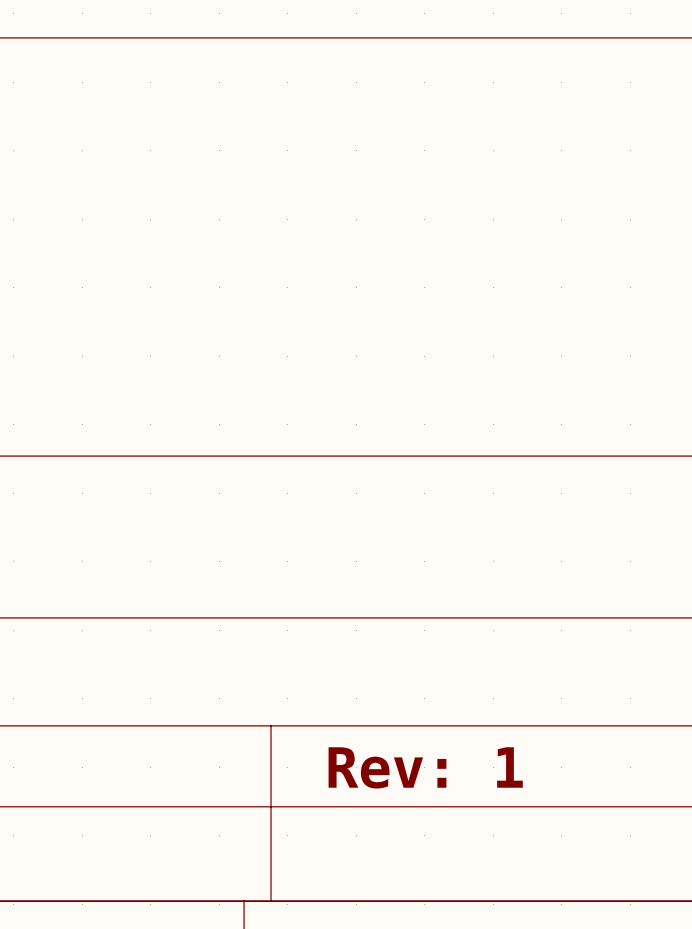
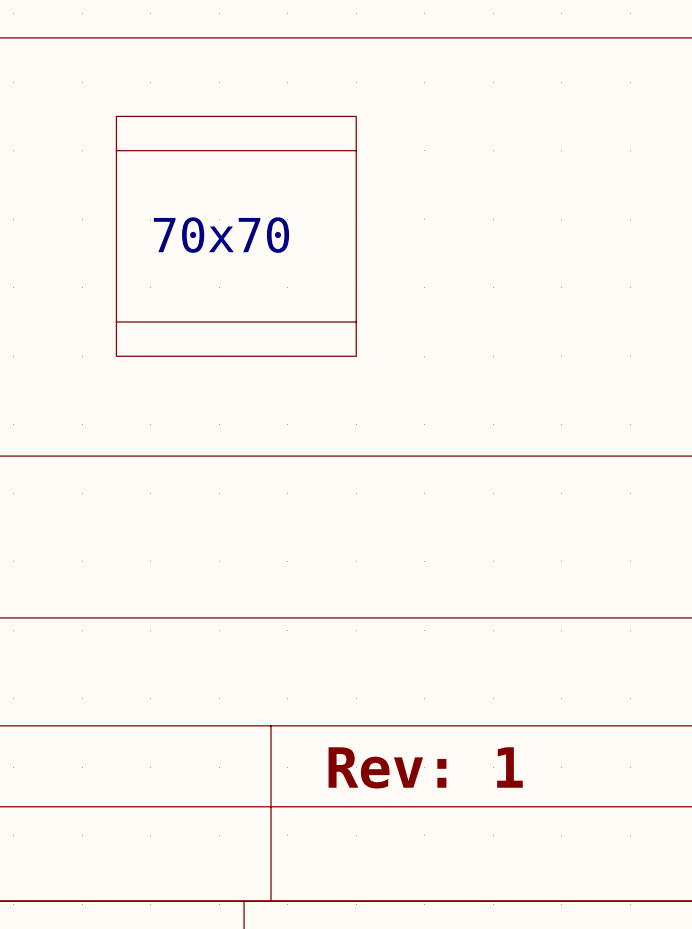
part: none -> (236, 150)
part: none -> 70x70 (236, 236)
part: none -> (236, 321)

